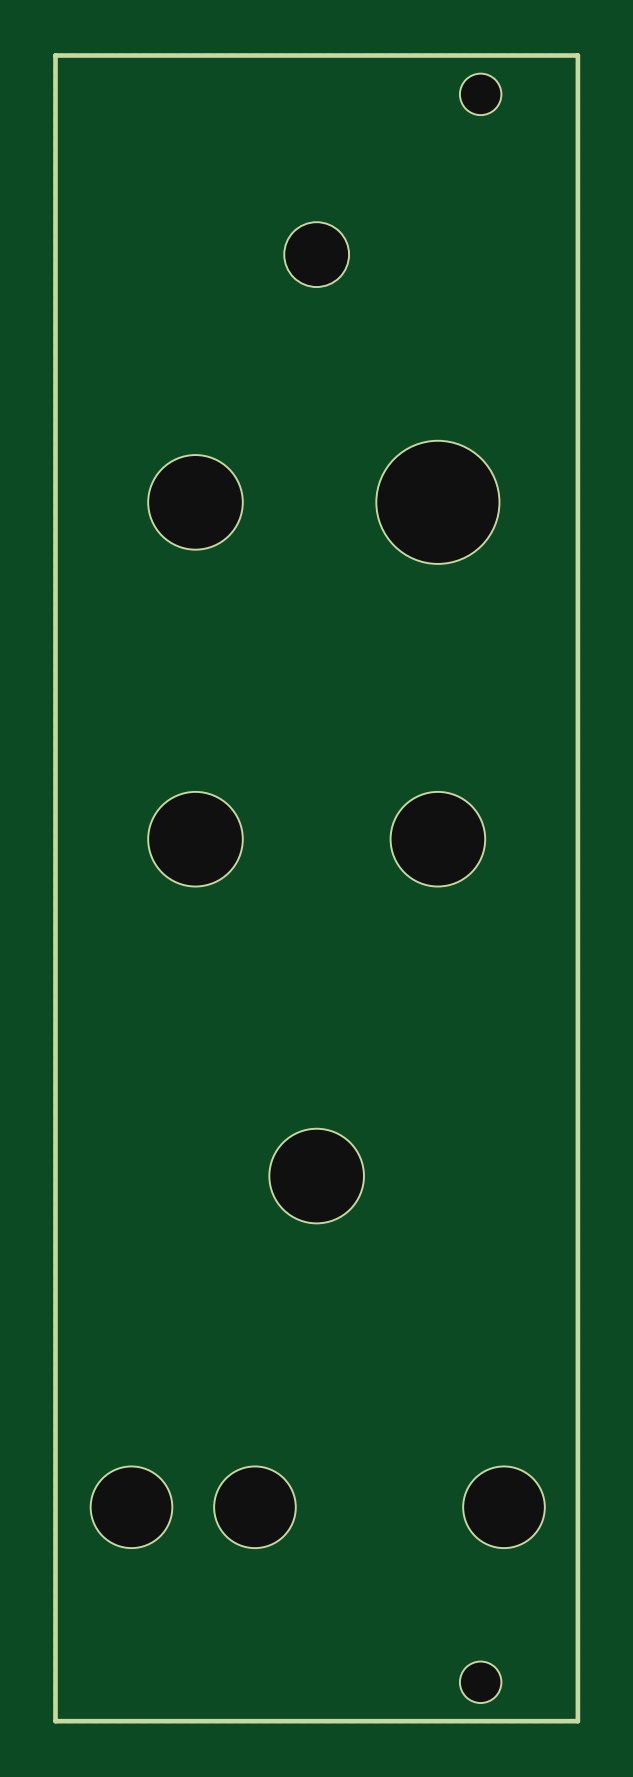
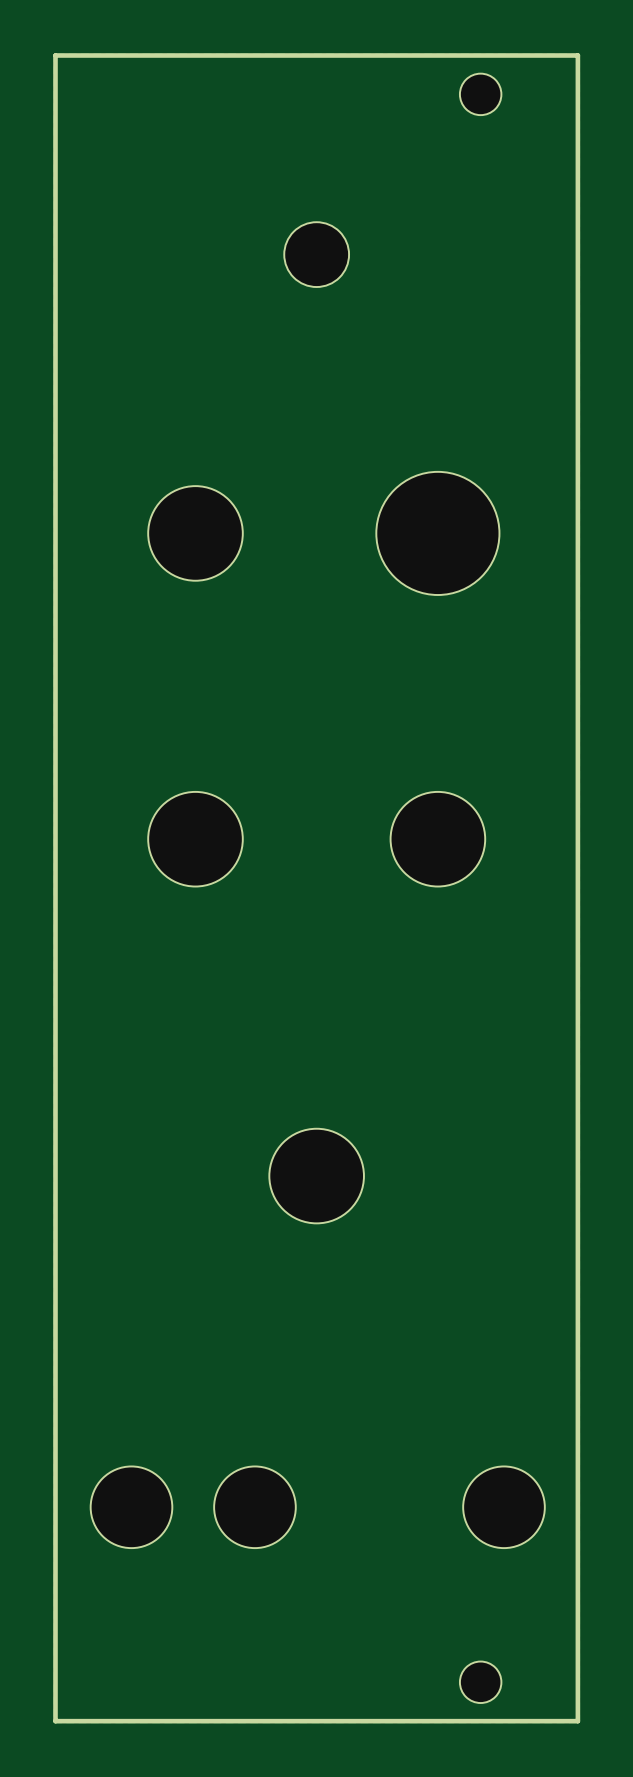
part position: (195, 502) -> (195, 533)
part position: (437, 502) -> (437, 533)

